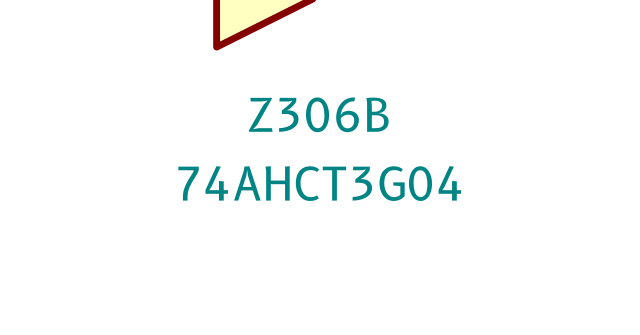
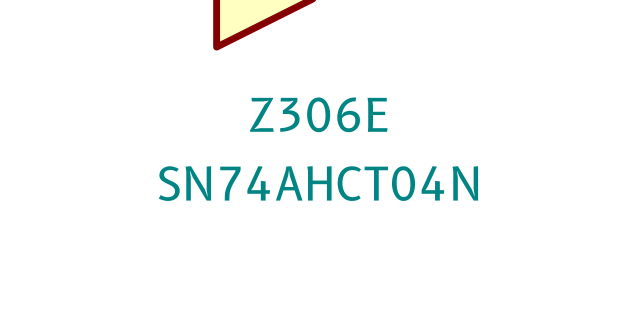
Z306B name: Z306B (318, 114) -> Z306E (318, 114)
Z306B value: 74AHCT3G04 (319, 183) -> SN74AHCT04N (318, 183)

